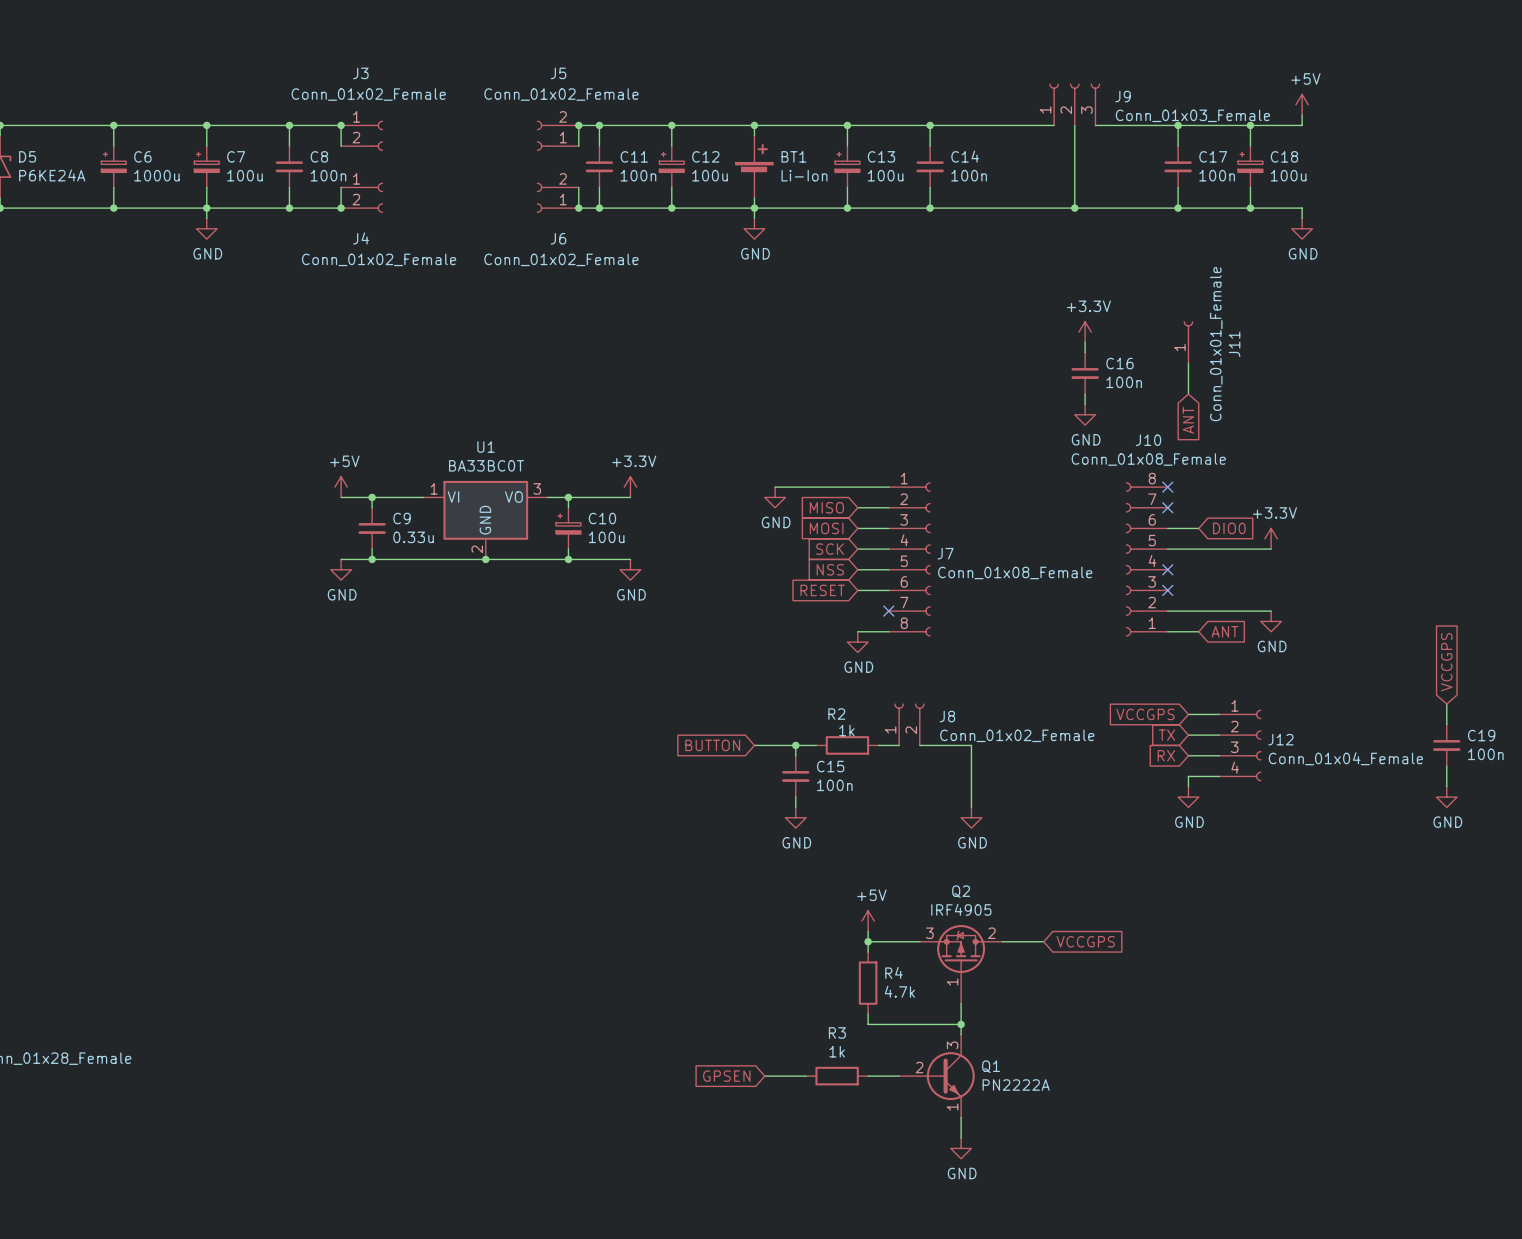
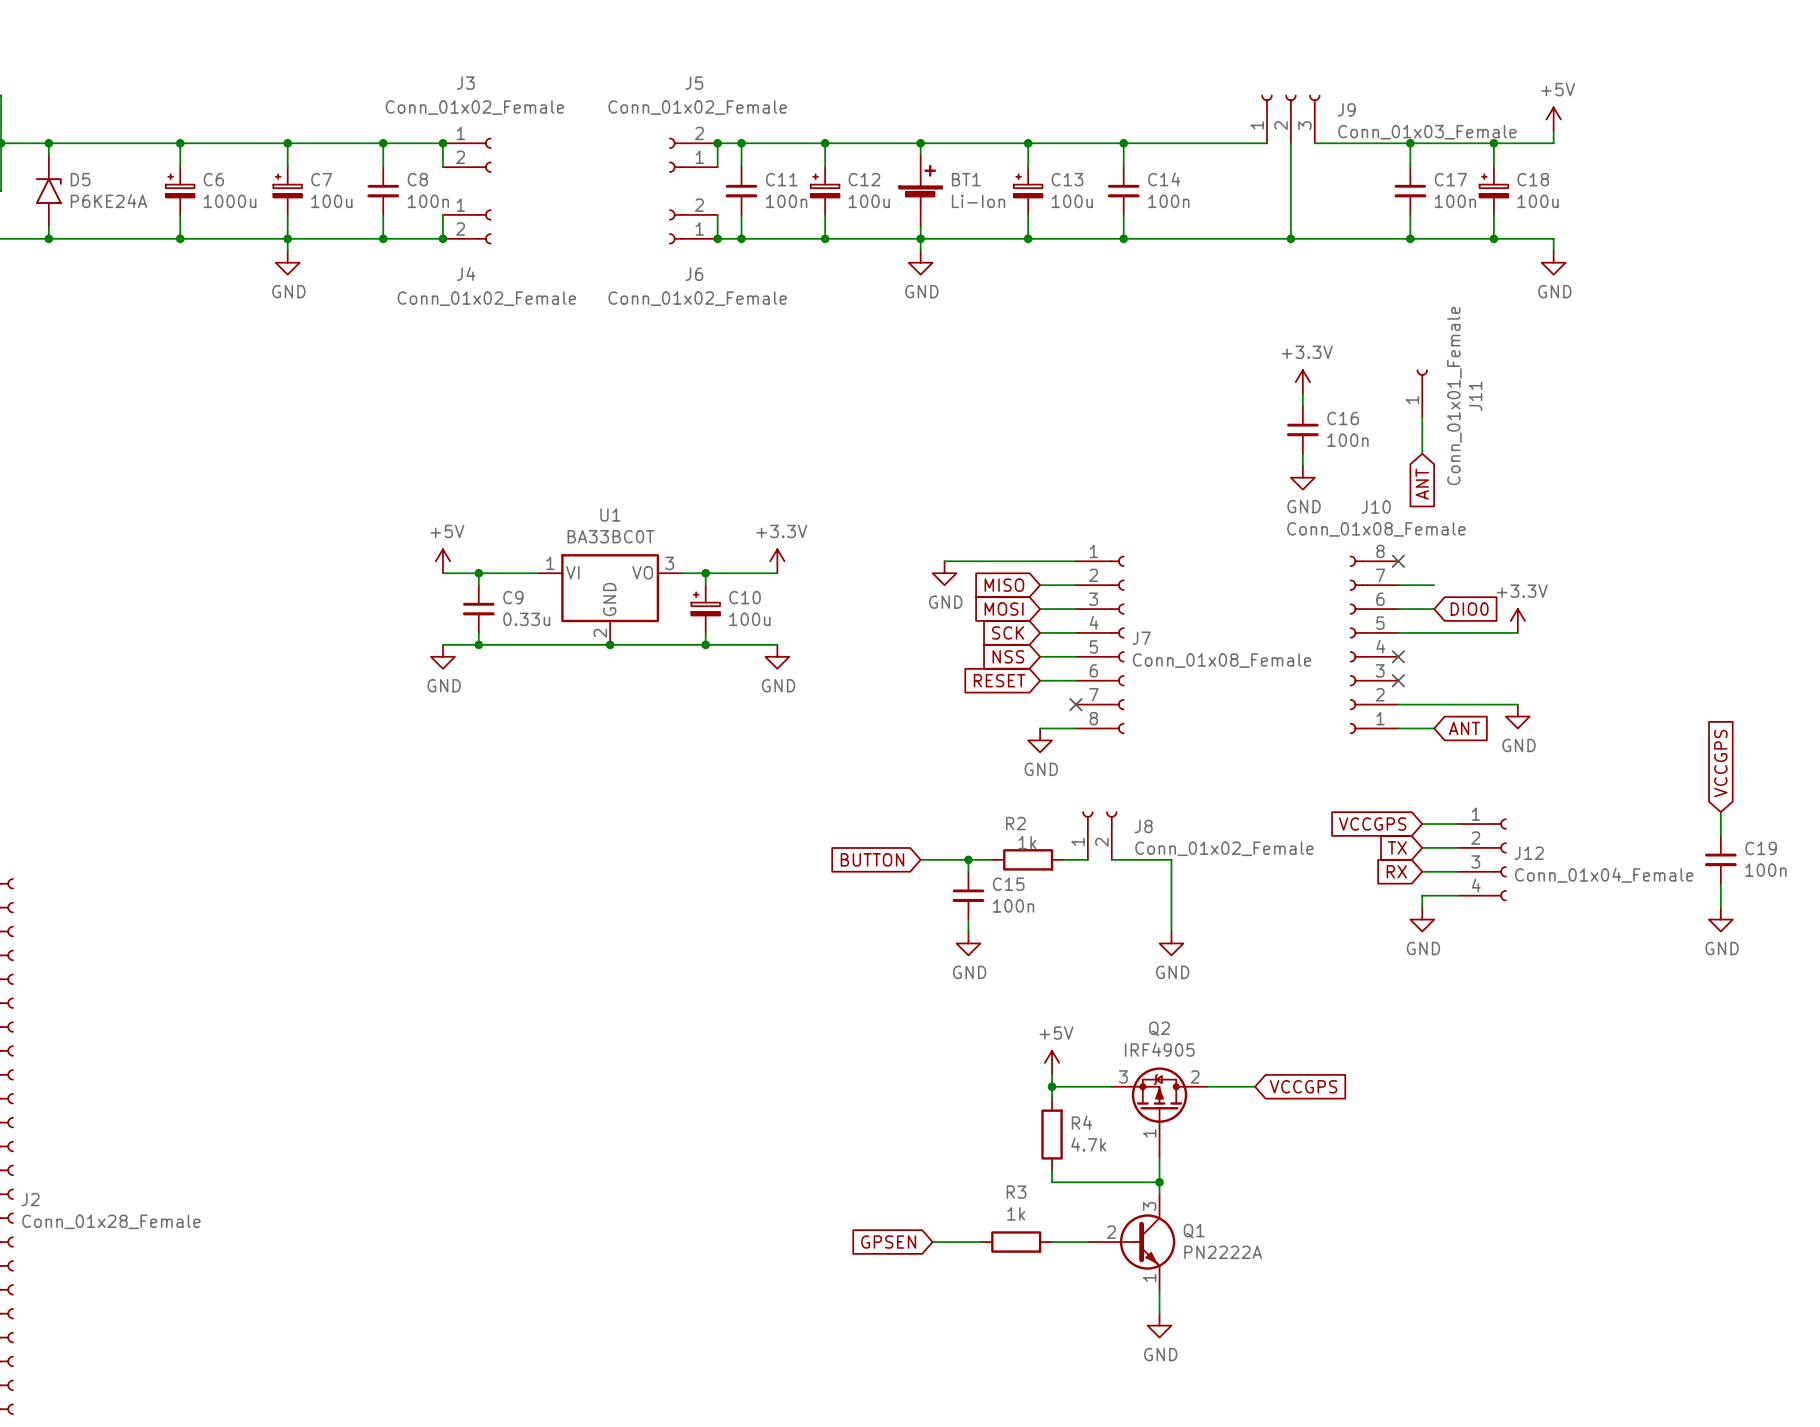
wire: none -> (1398, 585) (1434, 585)
no-connect mark: (1167, 507) -> none

